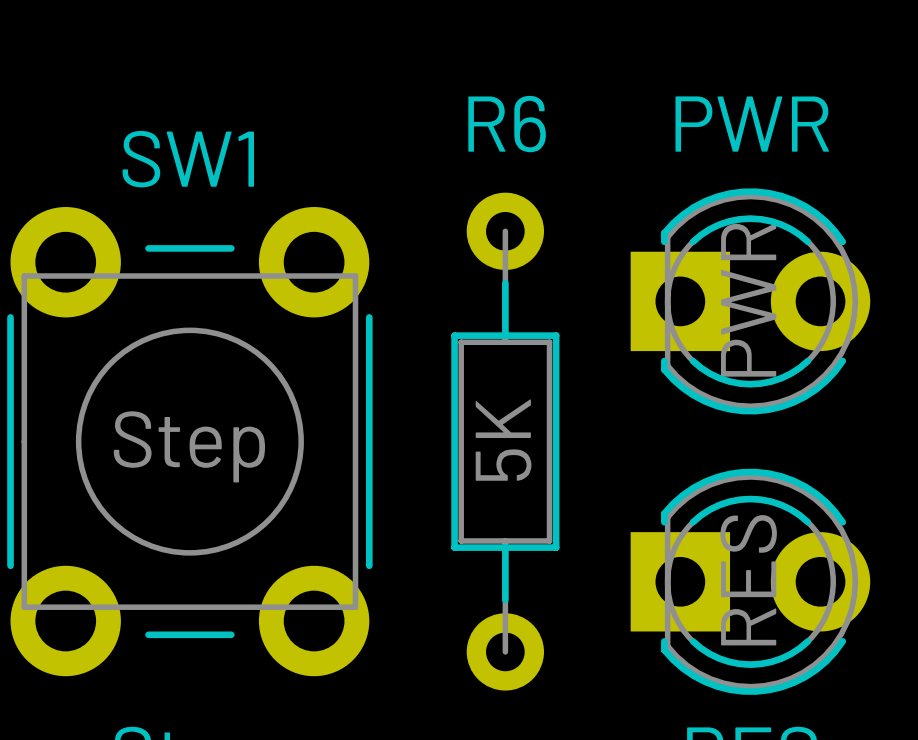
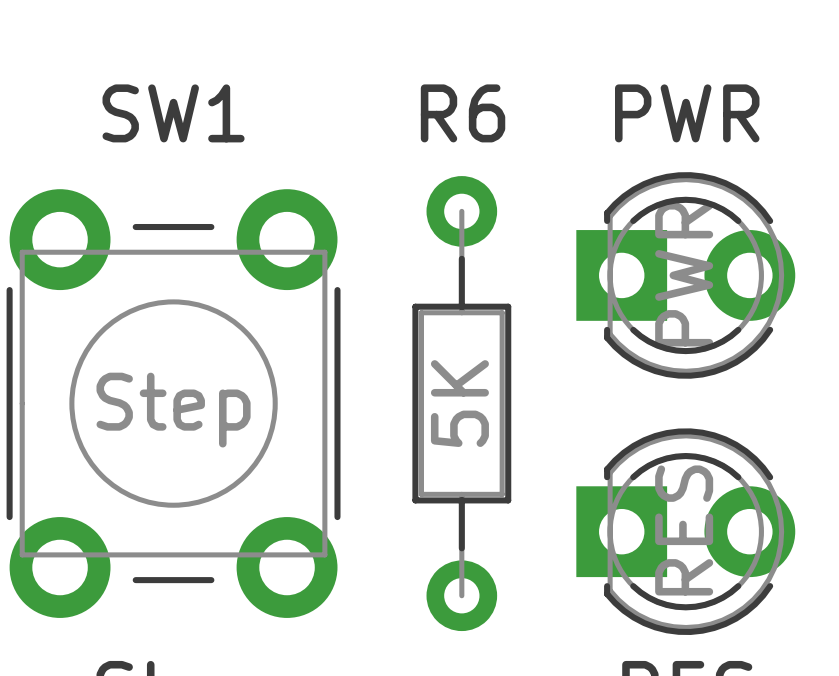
SW1 name position: SW1 (188, 159) -> SW1 (173, 113)

